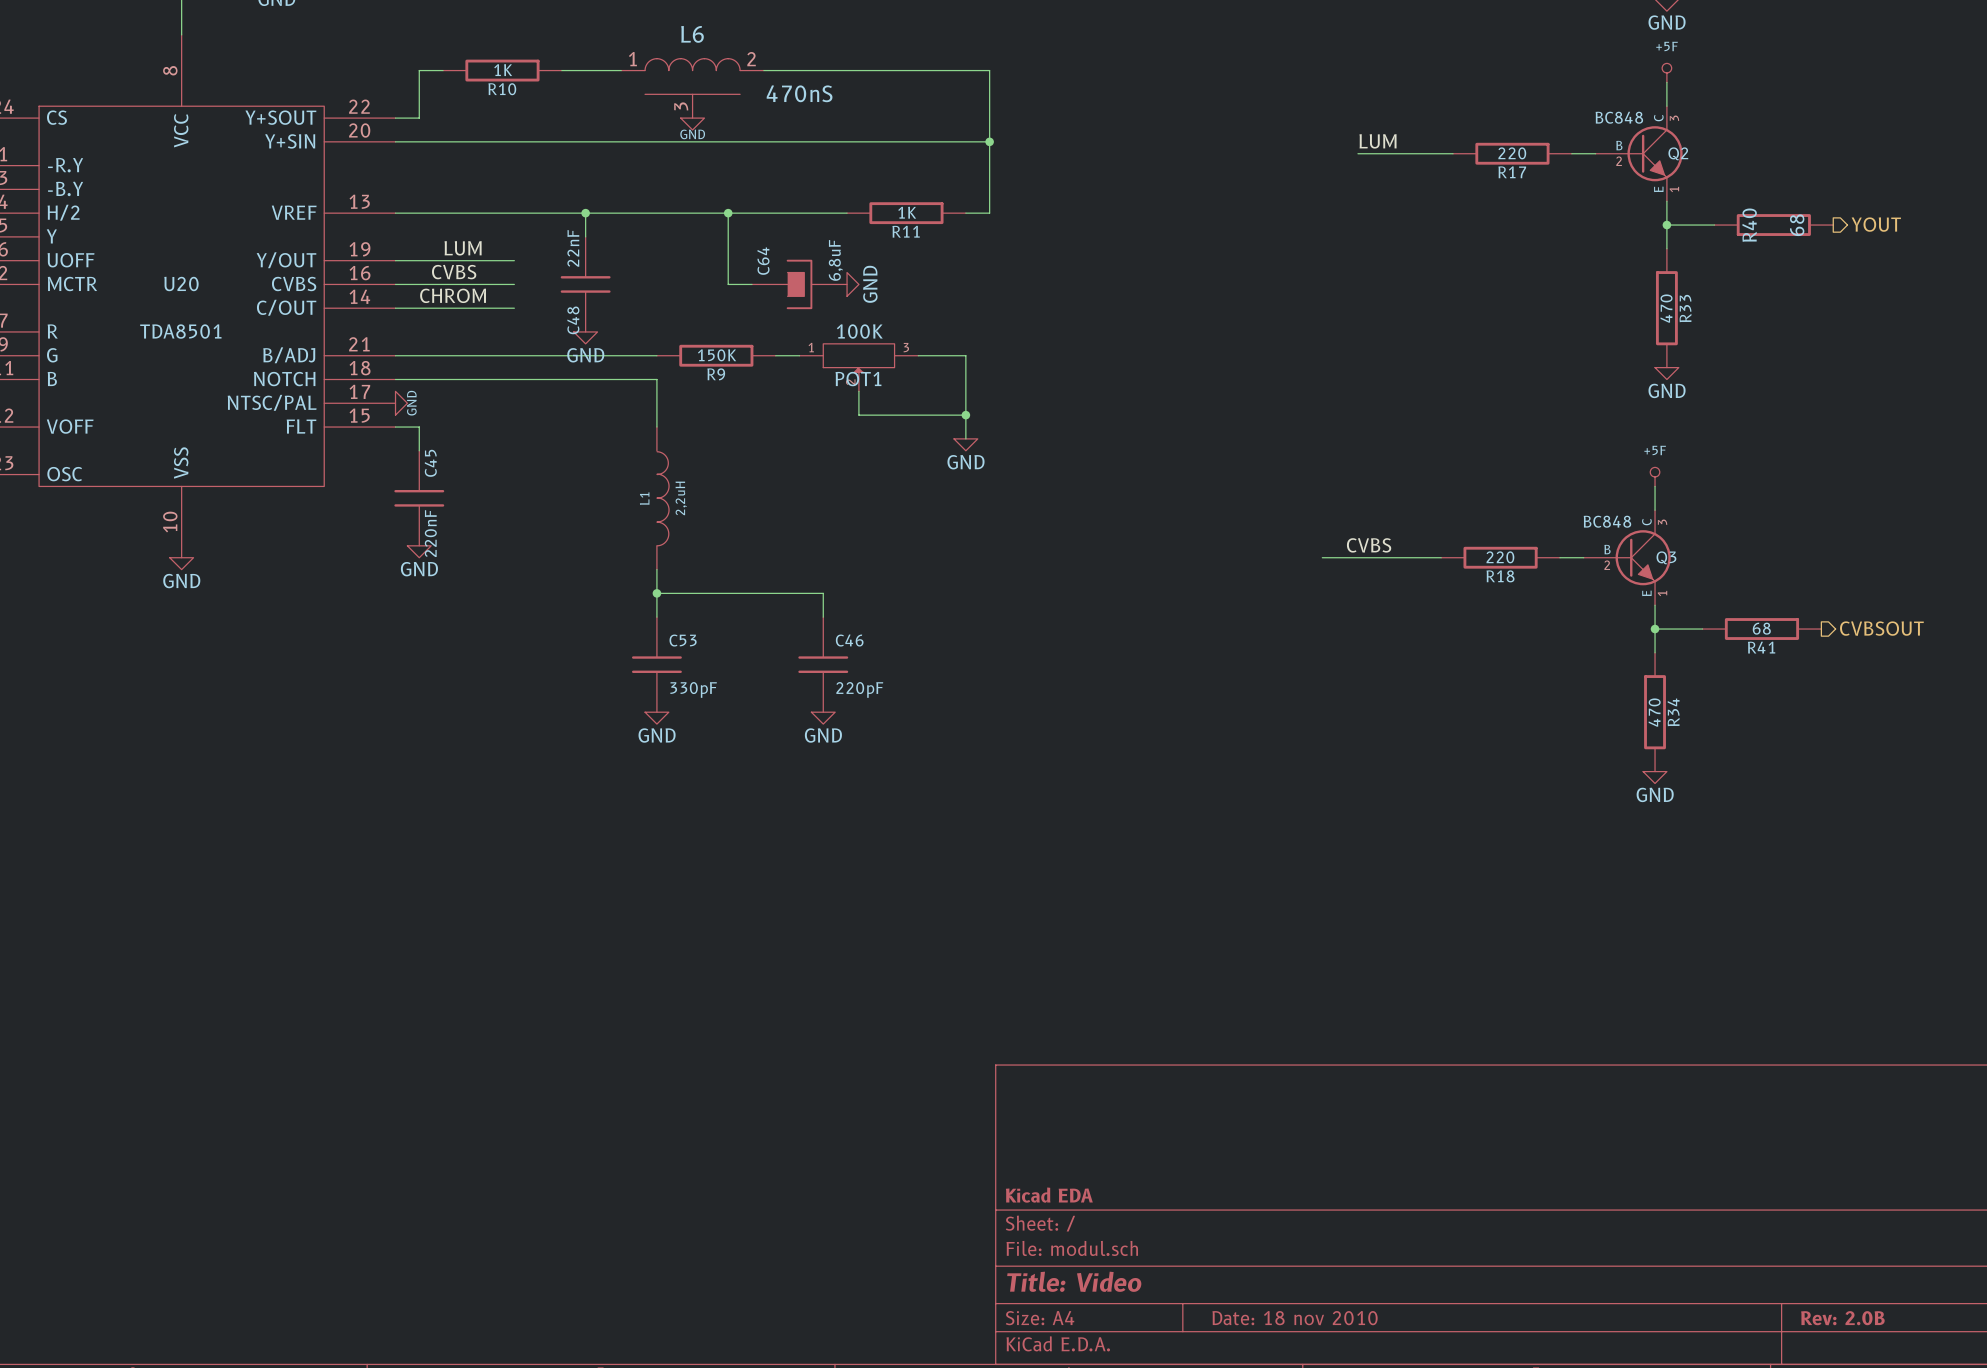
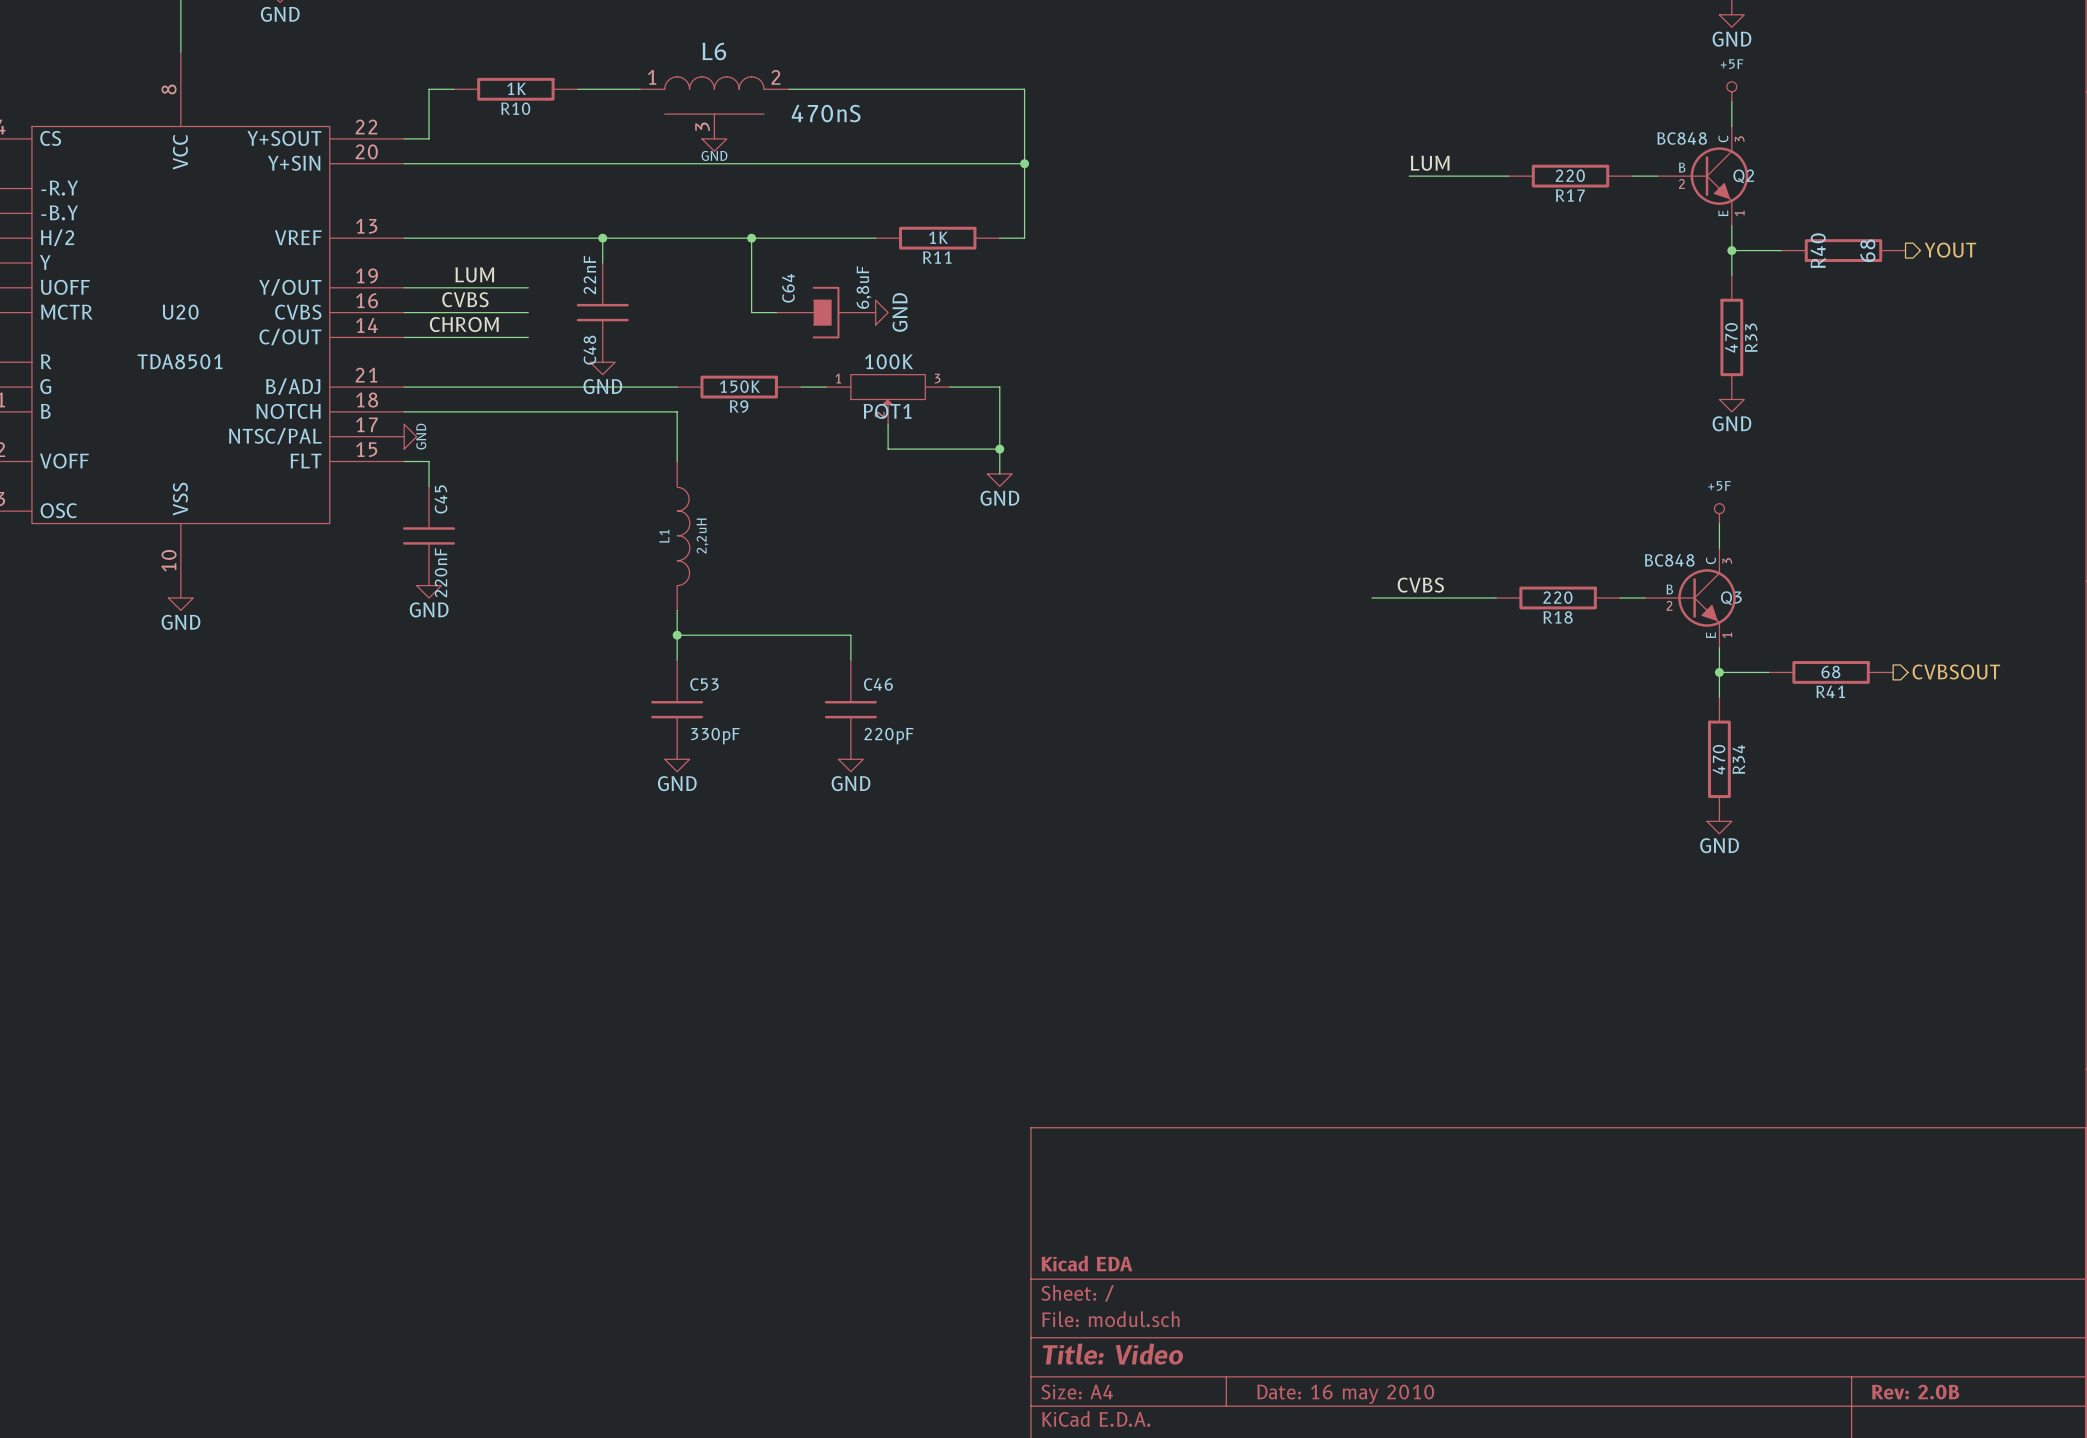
title block: Date: 18 nov 2010 (1295, 1318) -> Date: 16 may 2010 (1345, 1394)

